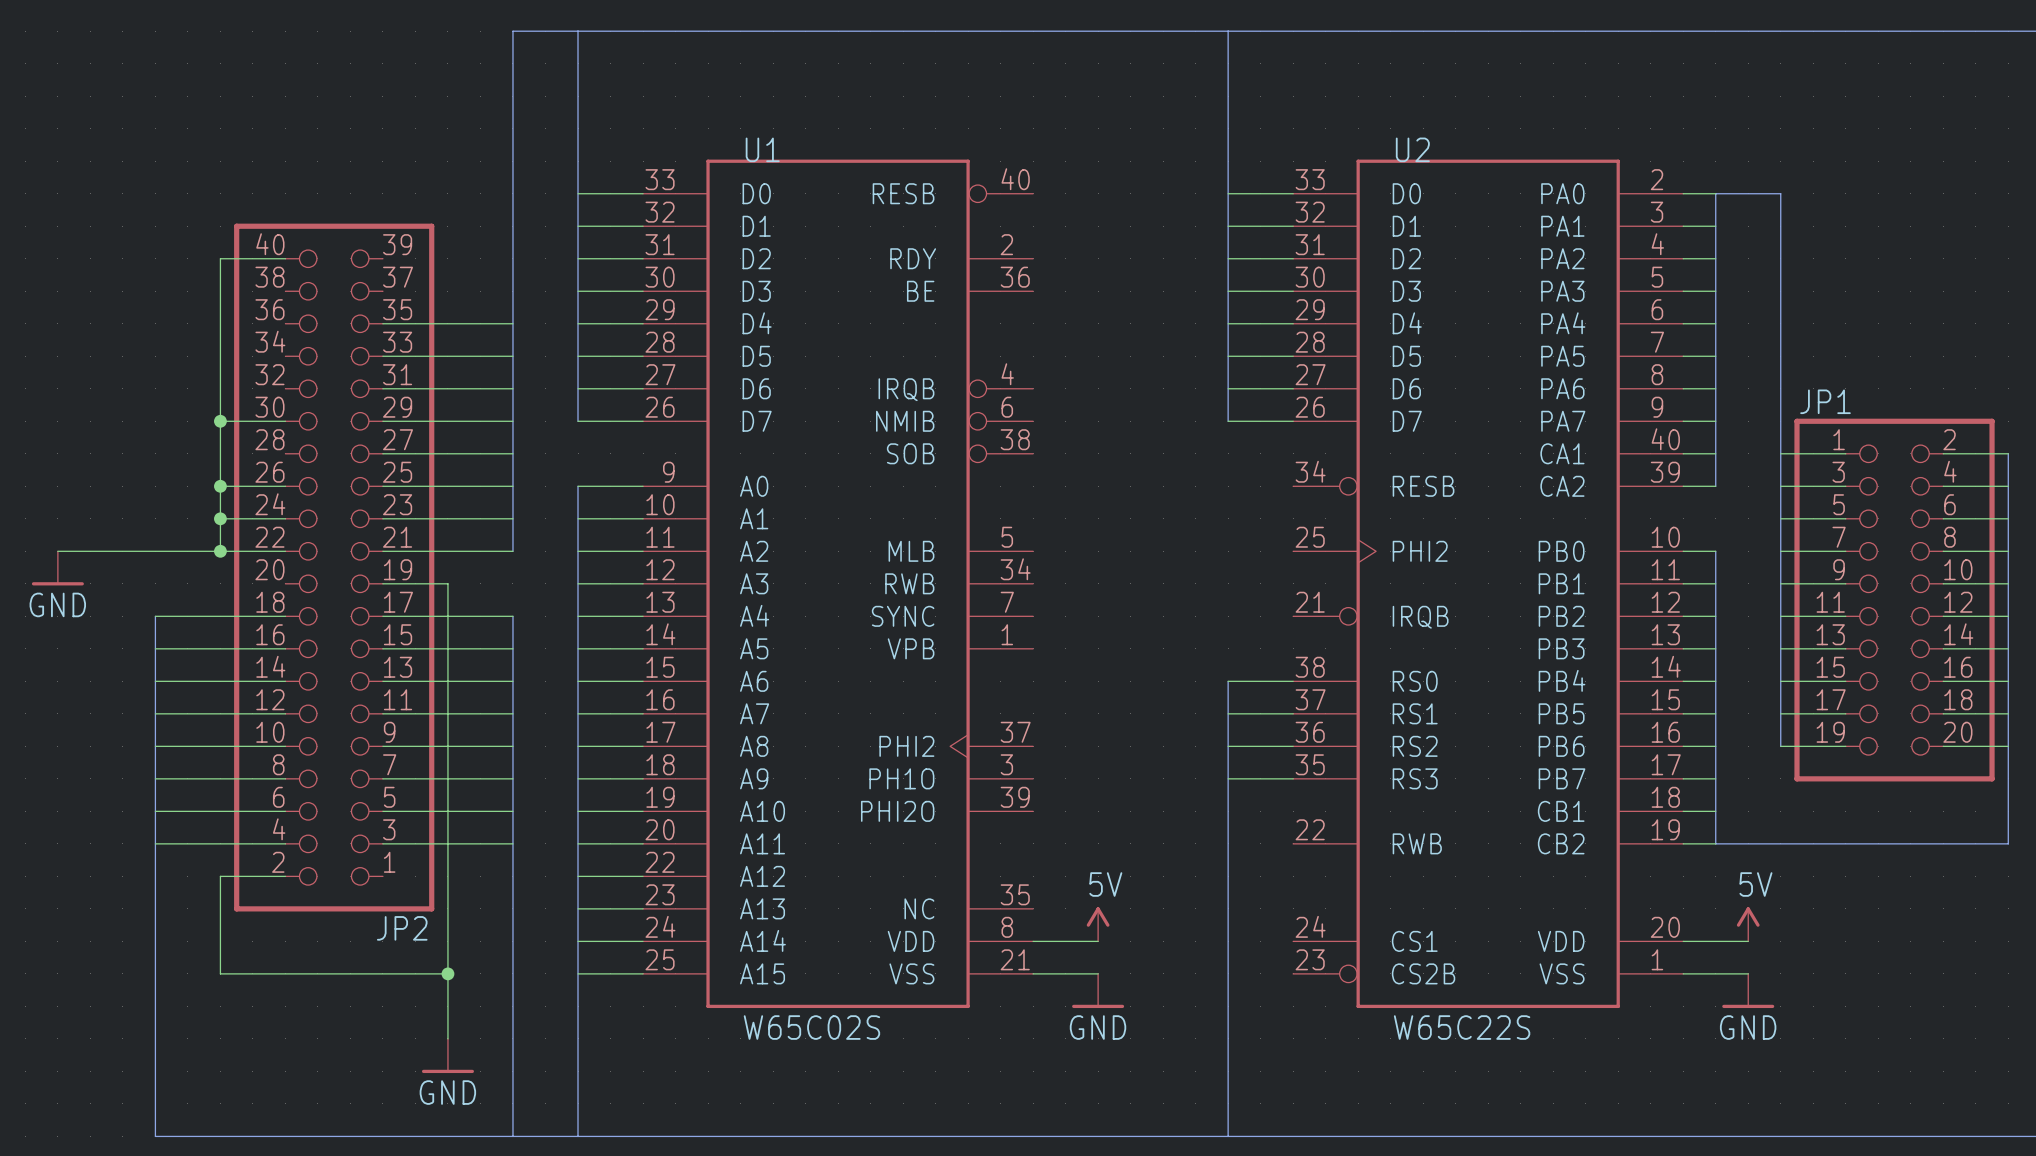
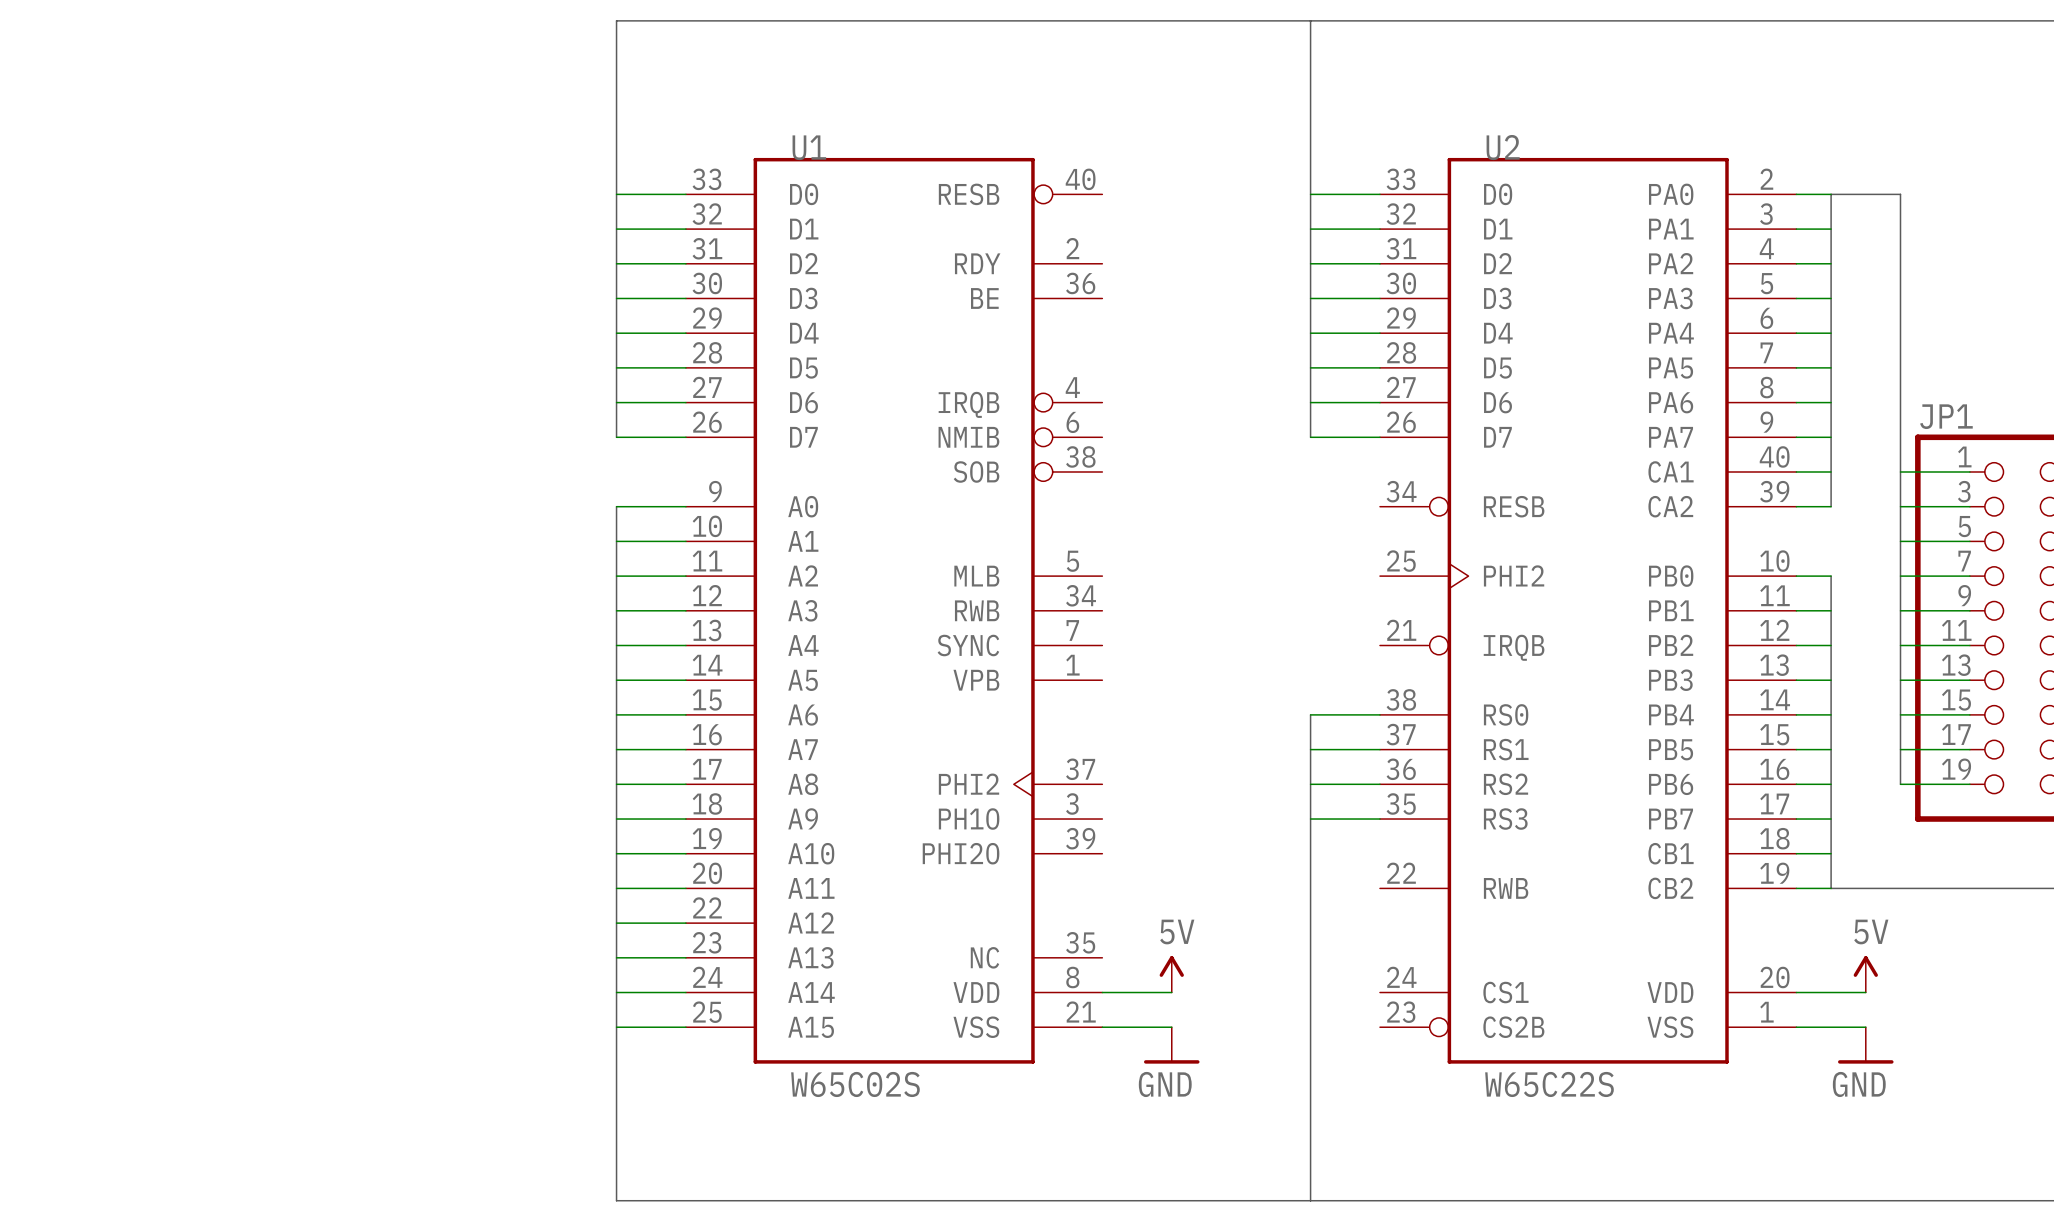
bus: (578, 31) (512, 31) (512, 551) -> none
wire: (285, 258) (220, 258) (220, 551) -> none
wire: (382, 323) (512, 323) -> none
wire: (382, 356) (512, 356) -> none
wire: (382, 388) (512, 388) -> none
wire: (220, 421) (285, 421) -> none
junction: (220, 421) -> none
wire: (382, 421) (512, 421) -> none
wire: (382, 453) (512, 453) -> none
wire: (220, 486) (285, 486) -> none
junction: (220, 486) -> none
wire: (382, 486) (512, 486) -> none
wire: (220, 518) (285, 518) -> none
junction: (220, 518) -> none
wire: (382, 518) (512, 518) -> none
wire: (57, 551) (285, 551) -> none
junction: (220, 551) -> none
wire: (382, 551) (512, 551) -> none
JP2: (334, 567) -> none
power symbol: GND (57, 568) -> none
wire: (382, 583) (447, 583) (447, 1038) -> none
bus: (155, 616) (155, 1136) (578, 1136) -> none
wire: (155, 616) (285, 616) -> none
wire: (382, 616) (512, 616) -> none
bus: (512, 616) (512, 1136) -> none
wire: (155, 648) (285, 648) -> none
wire: (382, 648) (512, 648) -> none
wire: (155, 681) (285, 681) -> none
wire: (382, 681) (512, 681) -> none
wire: (155, 713) (285, 713) -> none
wire: (382, 713) (512, 713) -> none
wire: (155, 746) (285, 746) -> none
wire: (382, 746) (512, 746) -> none
wire: (155, 778) (285, 778) -> none
wire: (382, 778) (512, 778) -> none
wire: (155, 811) (285, 811) -> none
wire: (382, 811) (512, 811) -> none
wire: (155, 843) (285, 843) -> none
wire: (382, 843) (512, 843) -> none
wire: (285, 876) (220, 876) (220, 973) (447, 973) -> none
junction: (447, 973) -> none
power symbol: GND (447, 1055) -> none

